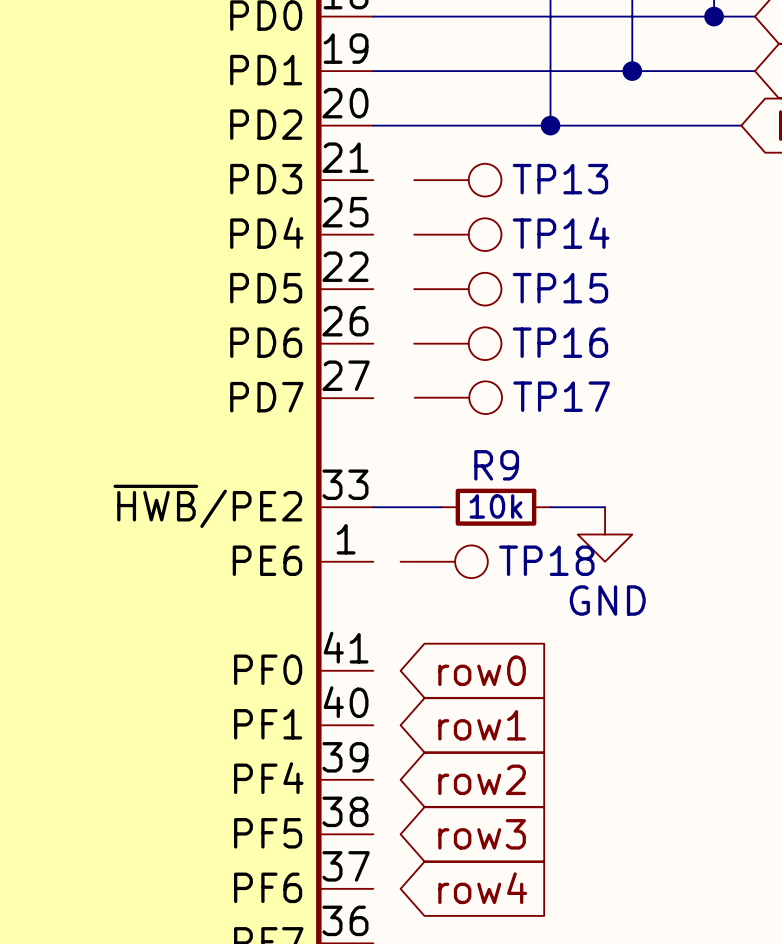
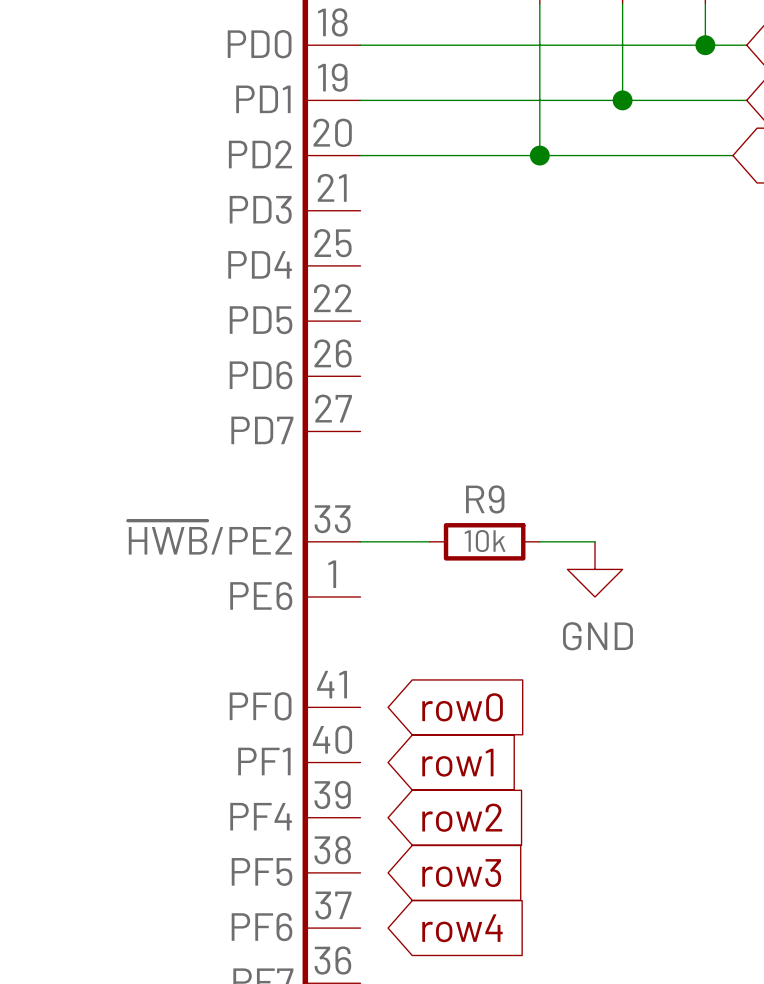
TP13: (457, 180) -> none
TP14: (457, 234) -> none
TP15: (457, 289) -> none
TP16: (457, 343) -> none
TP17: (458, 397) -> none
TP18: (444, 561) -> none

